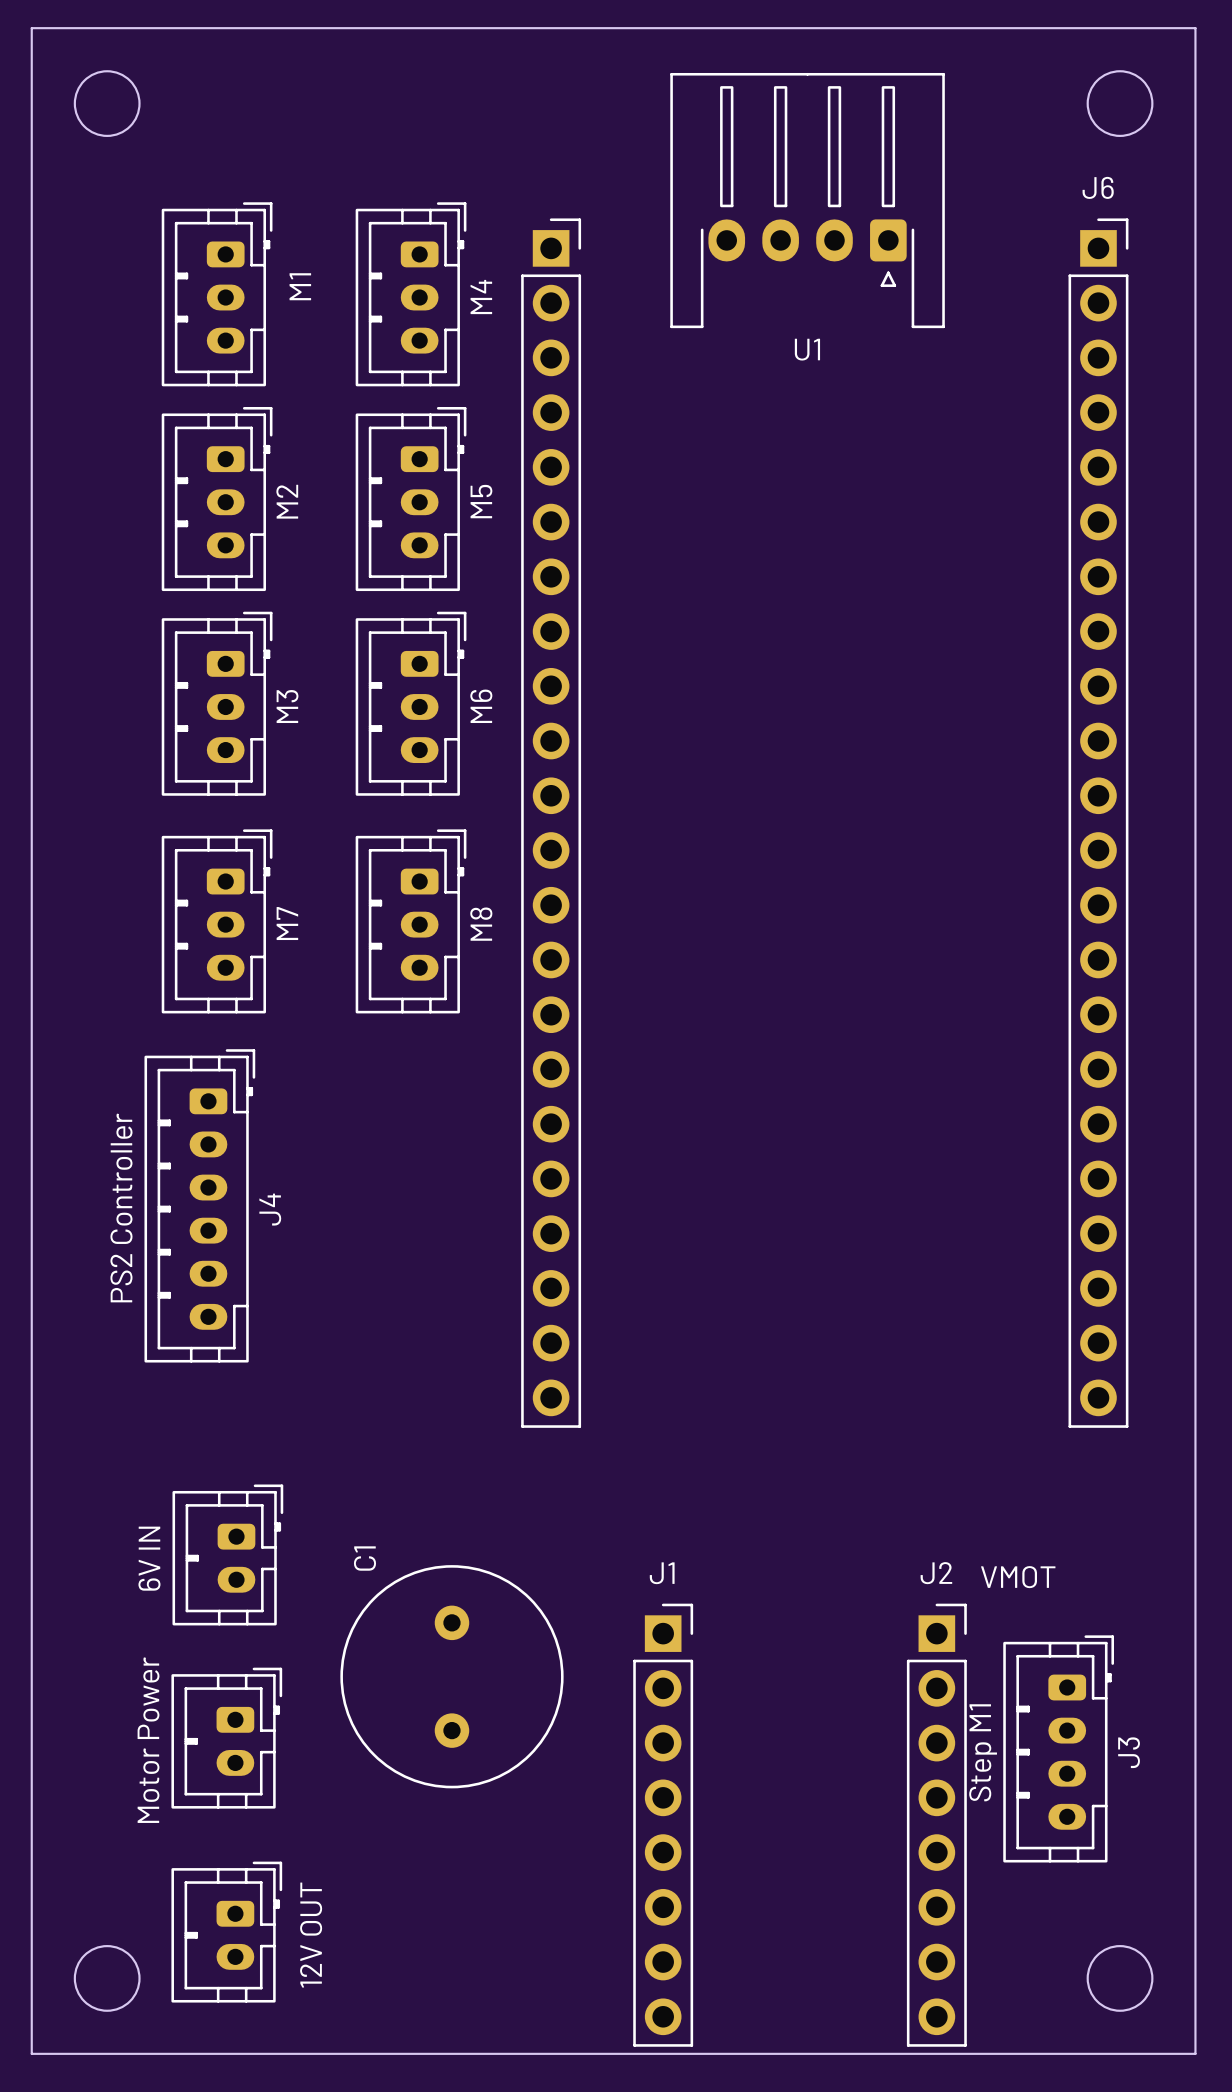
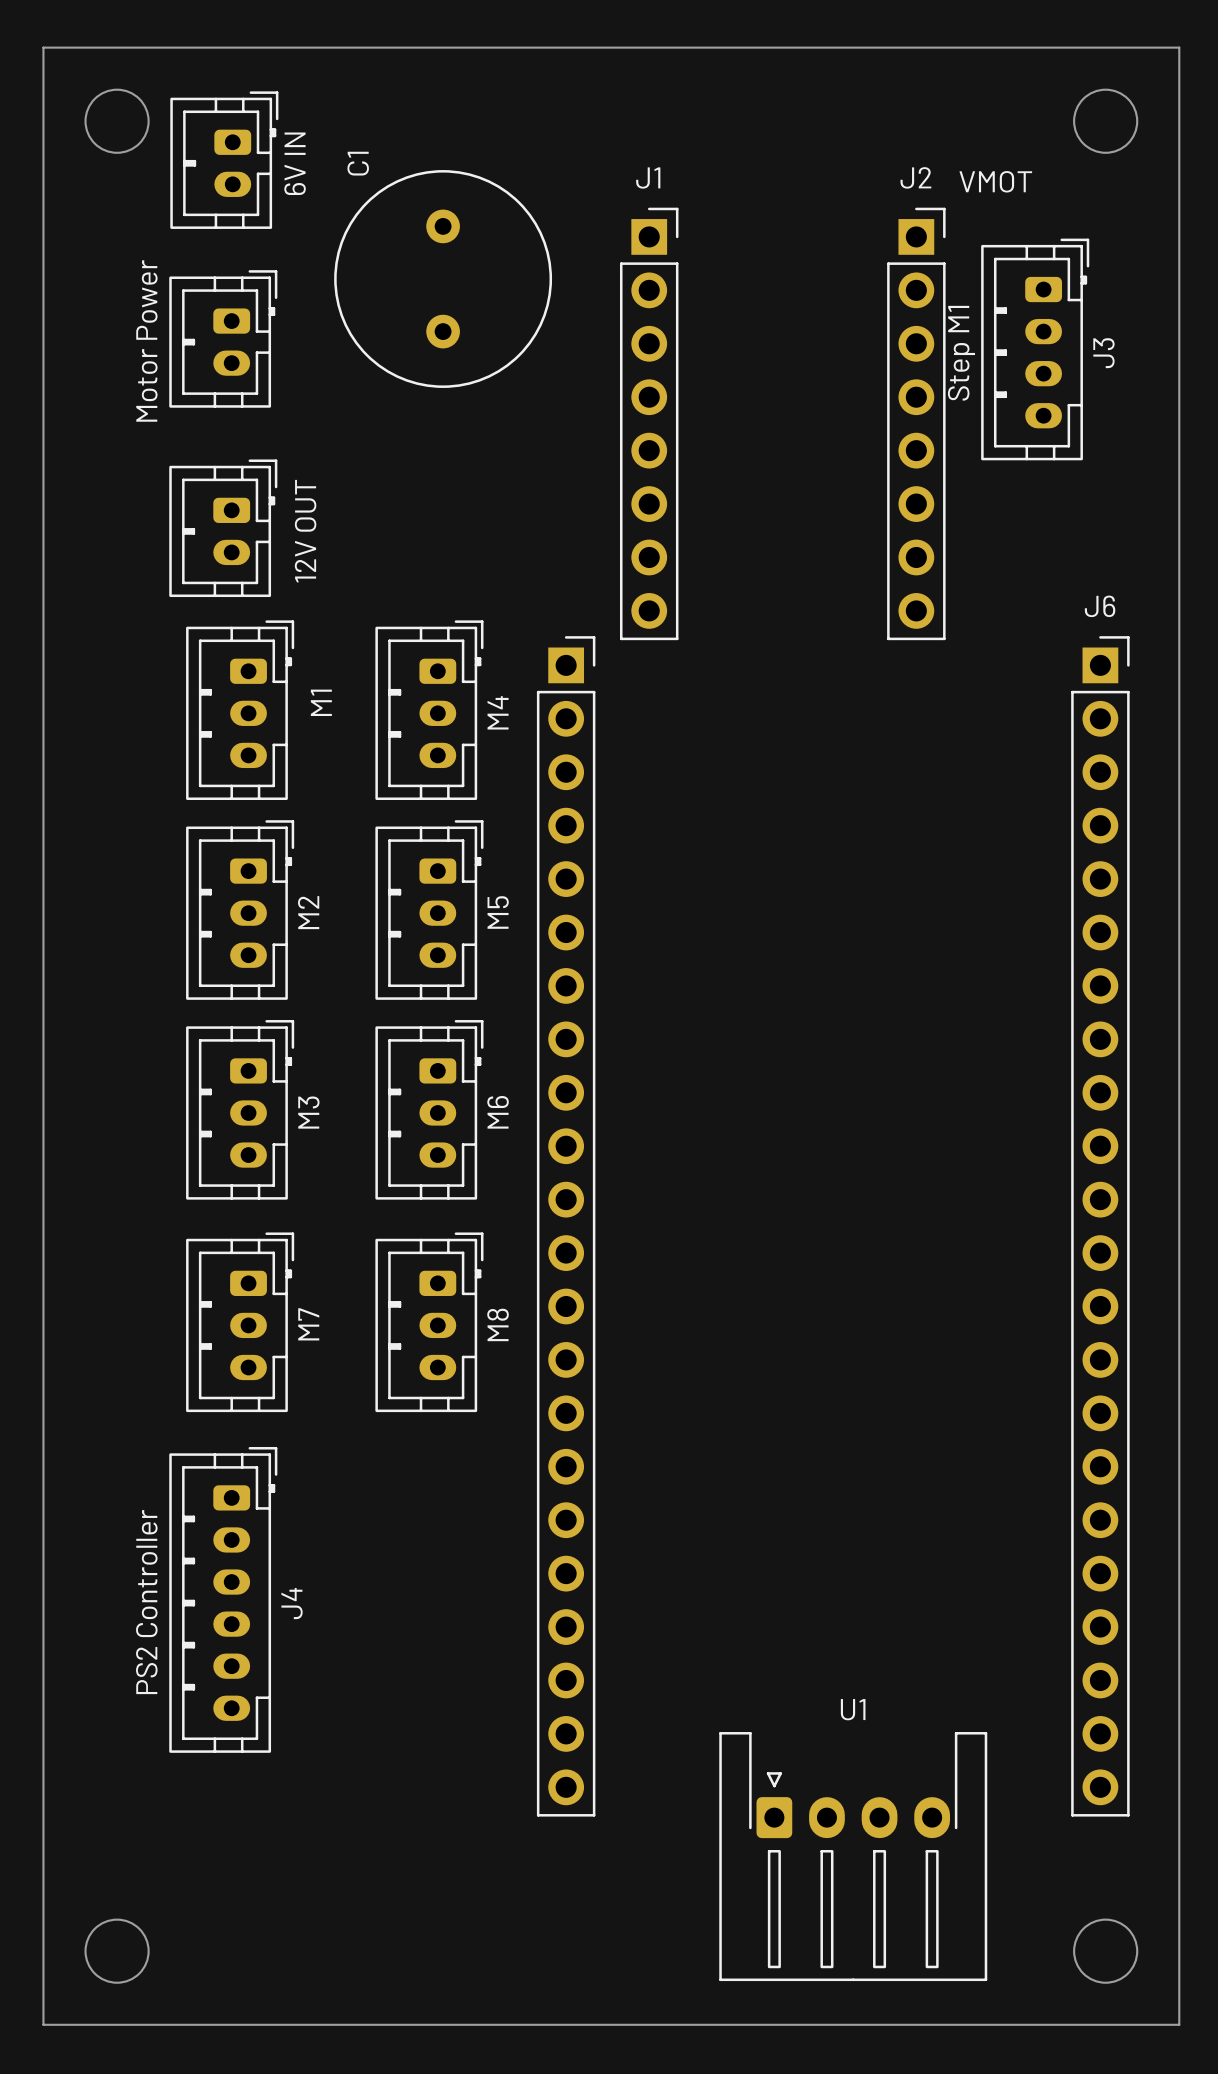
part: none -> 6V IN (224, 160)
text: none -> VMOT (995, 181)
U1 rotation: 0° (807, 200) -> 180° (853, 1856)
U1 position: (807, 200) -> (853, 1856)
M1 position: (217, 294) -> (240, 710)
M4 position: (411, 294) -> (429, 710)
part: none -> Motor Power (223, 338)
M2 position: (217, 499) -> (240, 910)
M5 position: (411, 499) -> (429, 910)
part: none -> 12V OUT (223, 528)
M3 position: (217, 703) -> (240, 1109)
M6 position: (411, 703) -> (429, 1109)
part position: (551, 823) -> (566, 1226)
J6 position: (1098, 823) -> (1100, 1226)
M7 position: (217, 921) -> (240, 1322)
M8 position: (411, 921) -> (429, 1322)
J4 position: (199, 1205) -> (223, 1599)
part: 6V IN (227, 1554) -> none
text: VMOT (1018, 1577) -> none
C1 position: (451, 1676) -> (443, 279)
part: Motor Power (226, 1738) -> none
J3 position: (1058, 1748) -> (1035, 349)
J1 position: (663, 1825) -> (649, 423)
J2 position: (936, 1825) -> (916, 423)
part: 12V OUT (226, 1932) -> none

